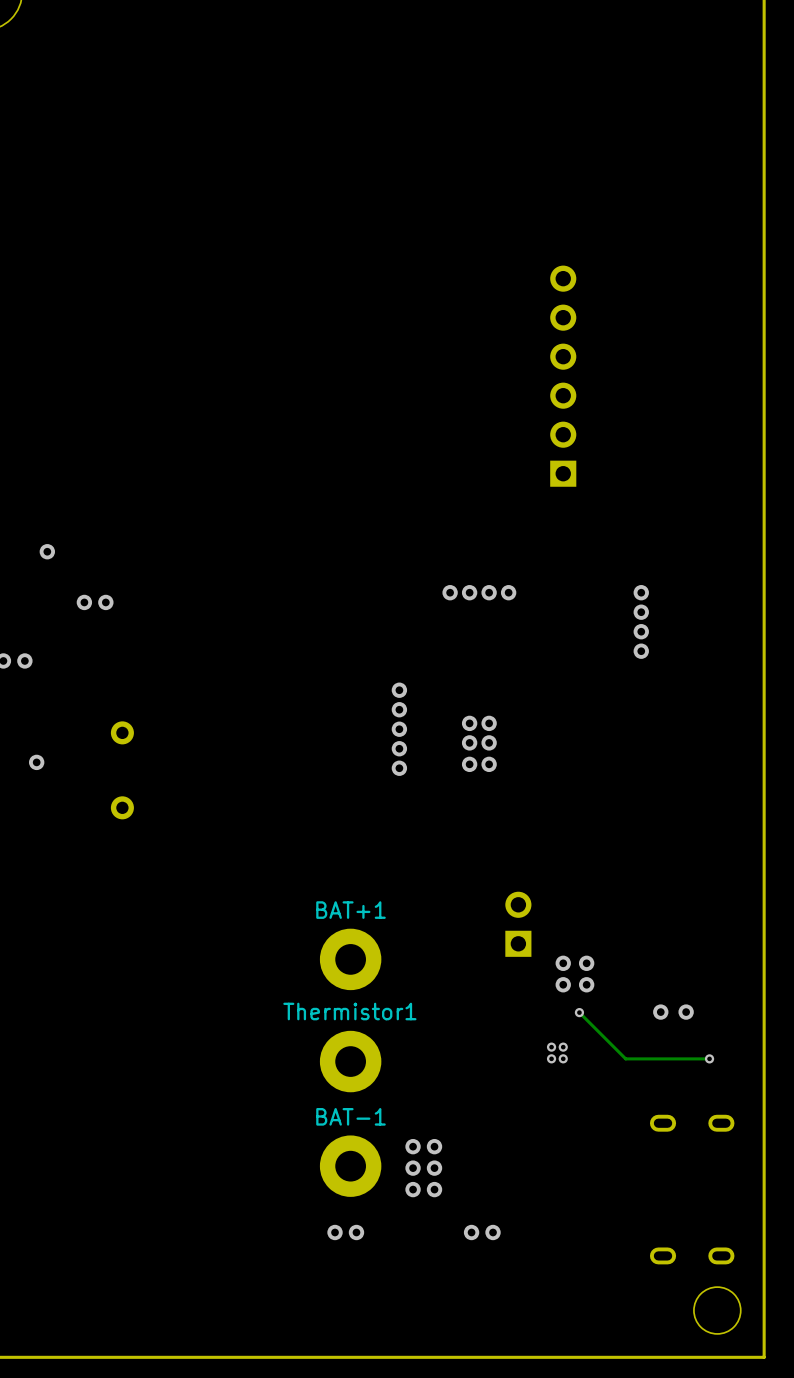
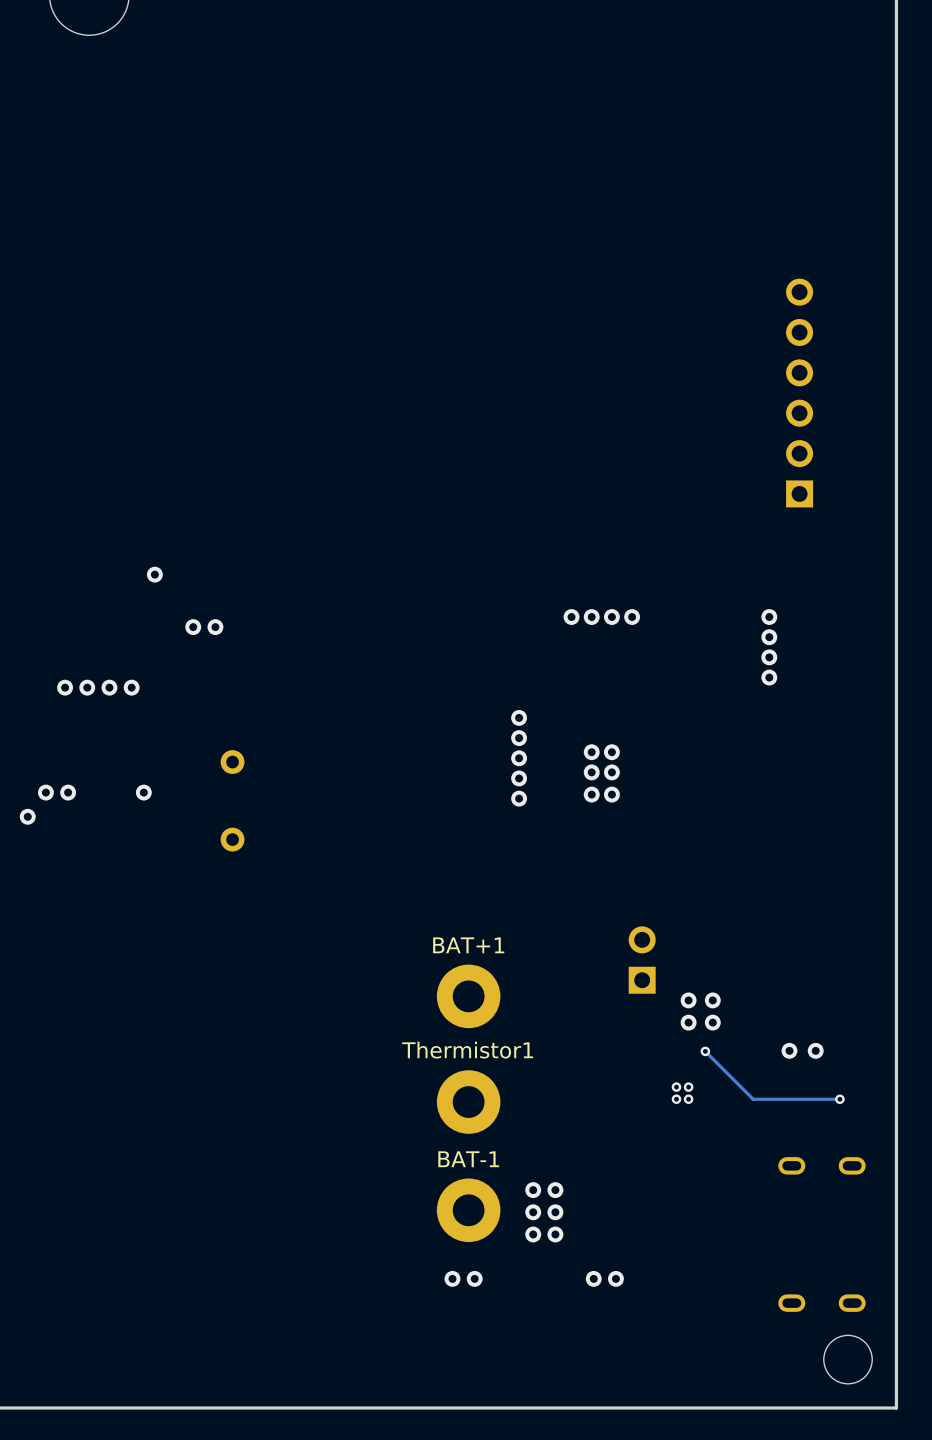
part position: (563, 376) -> (799, 393)

